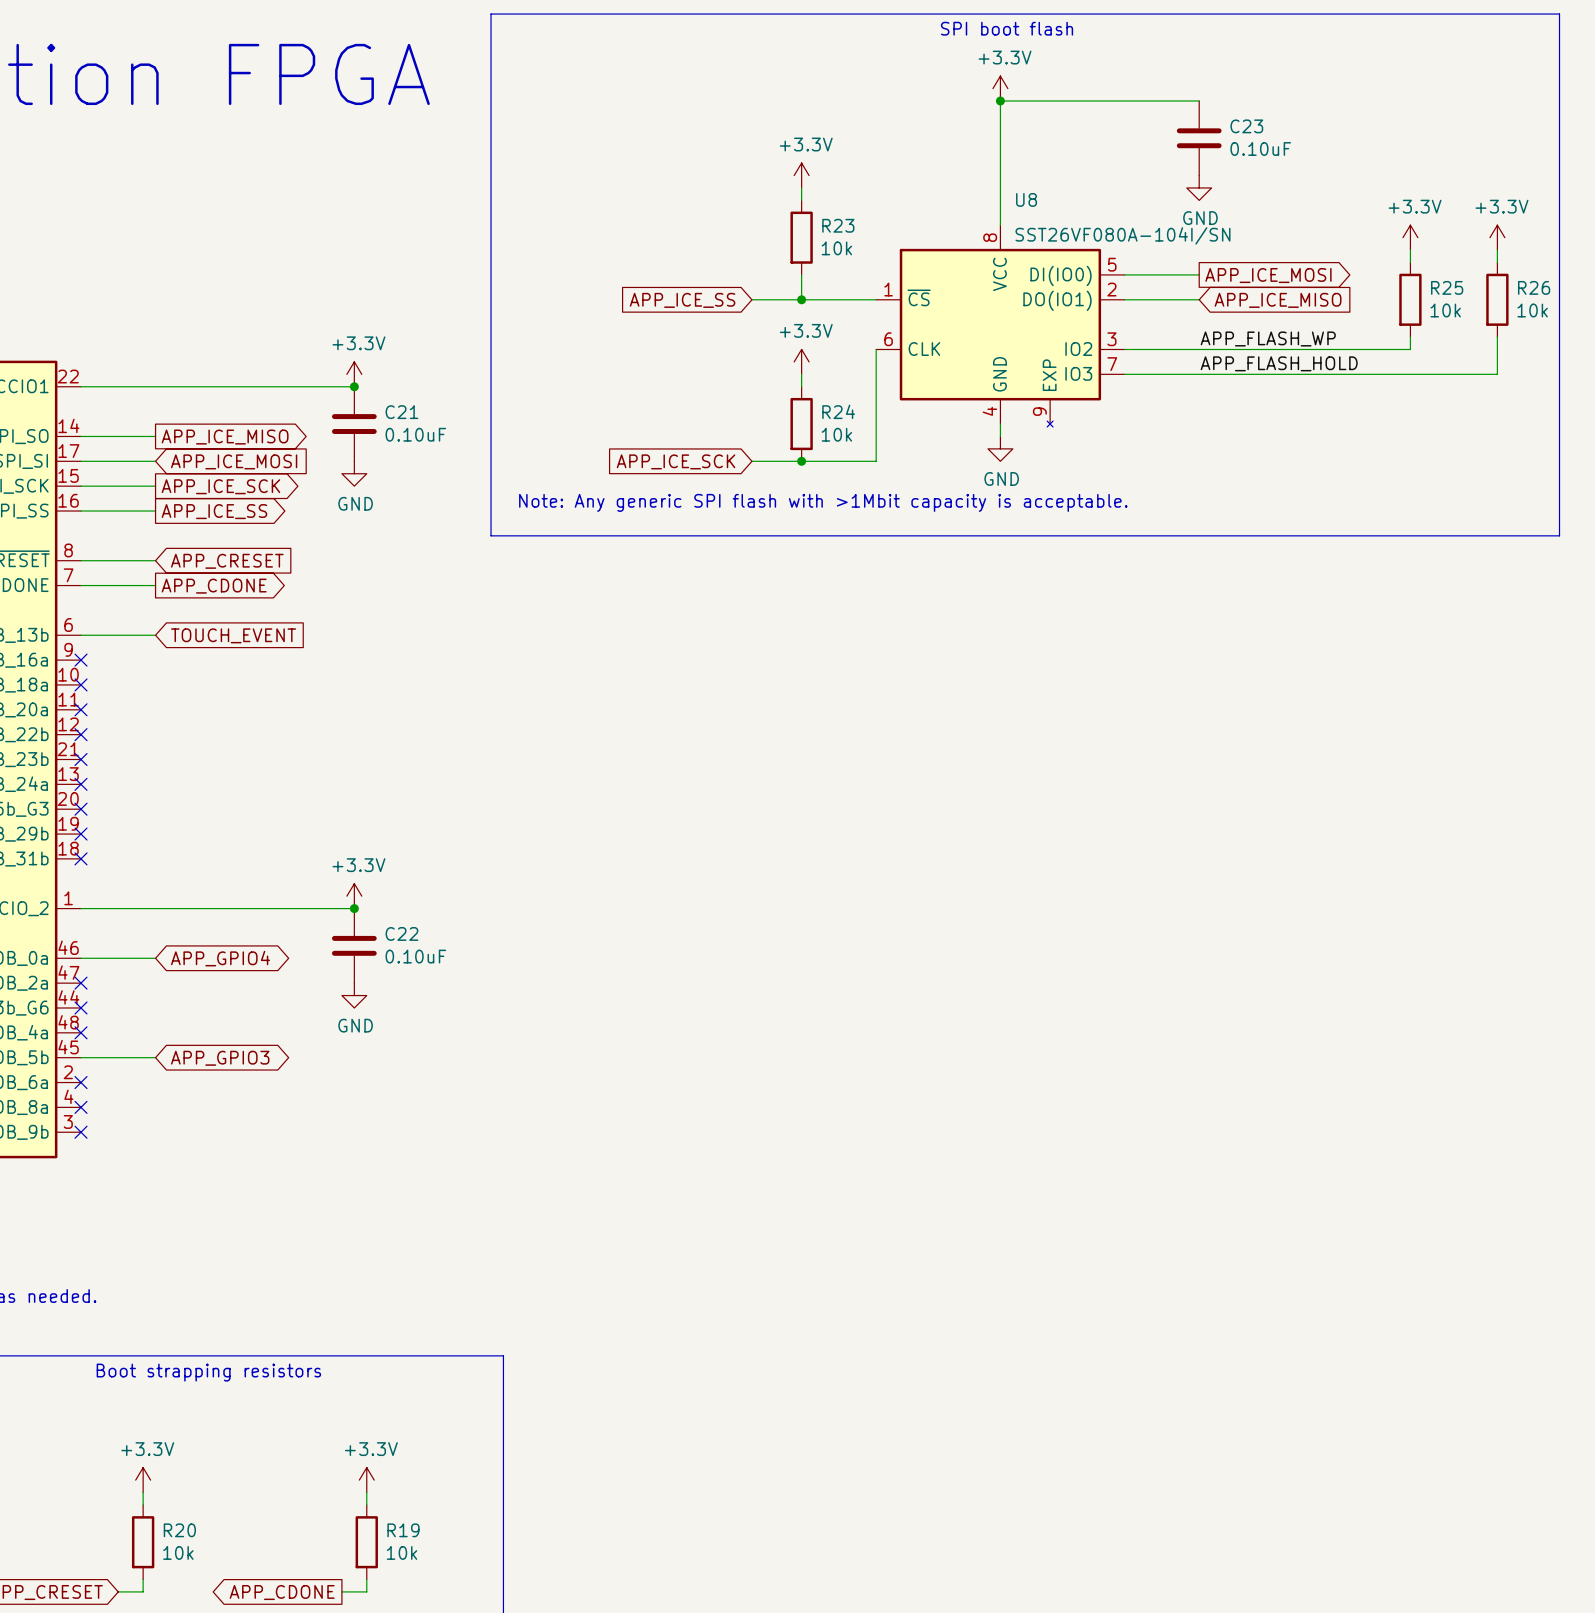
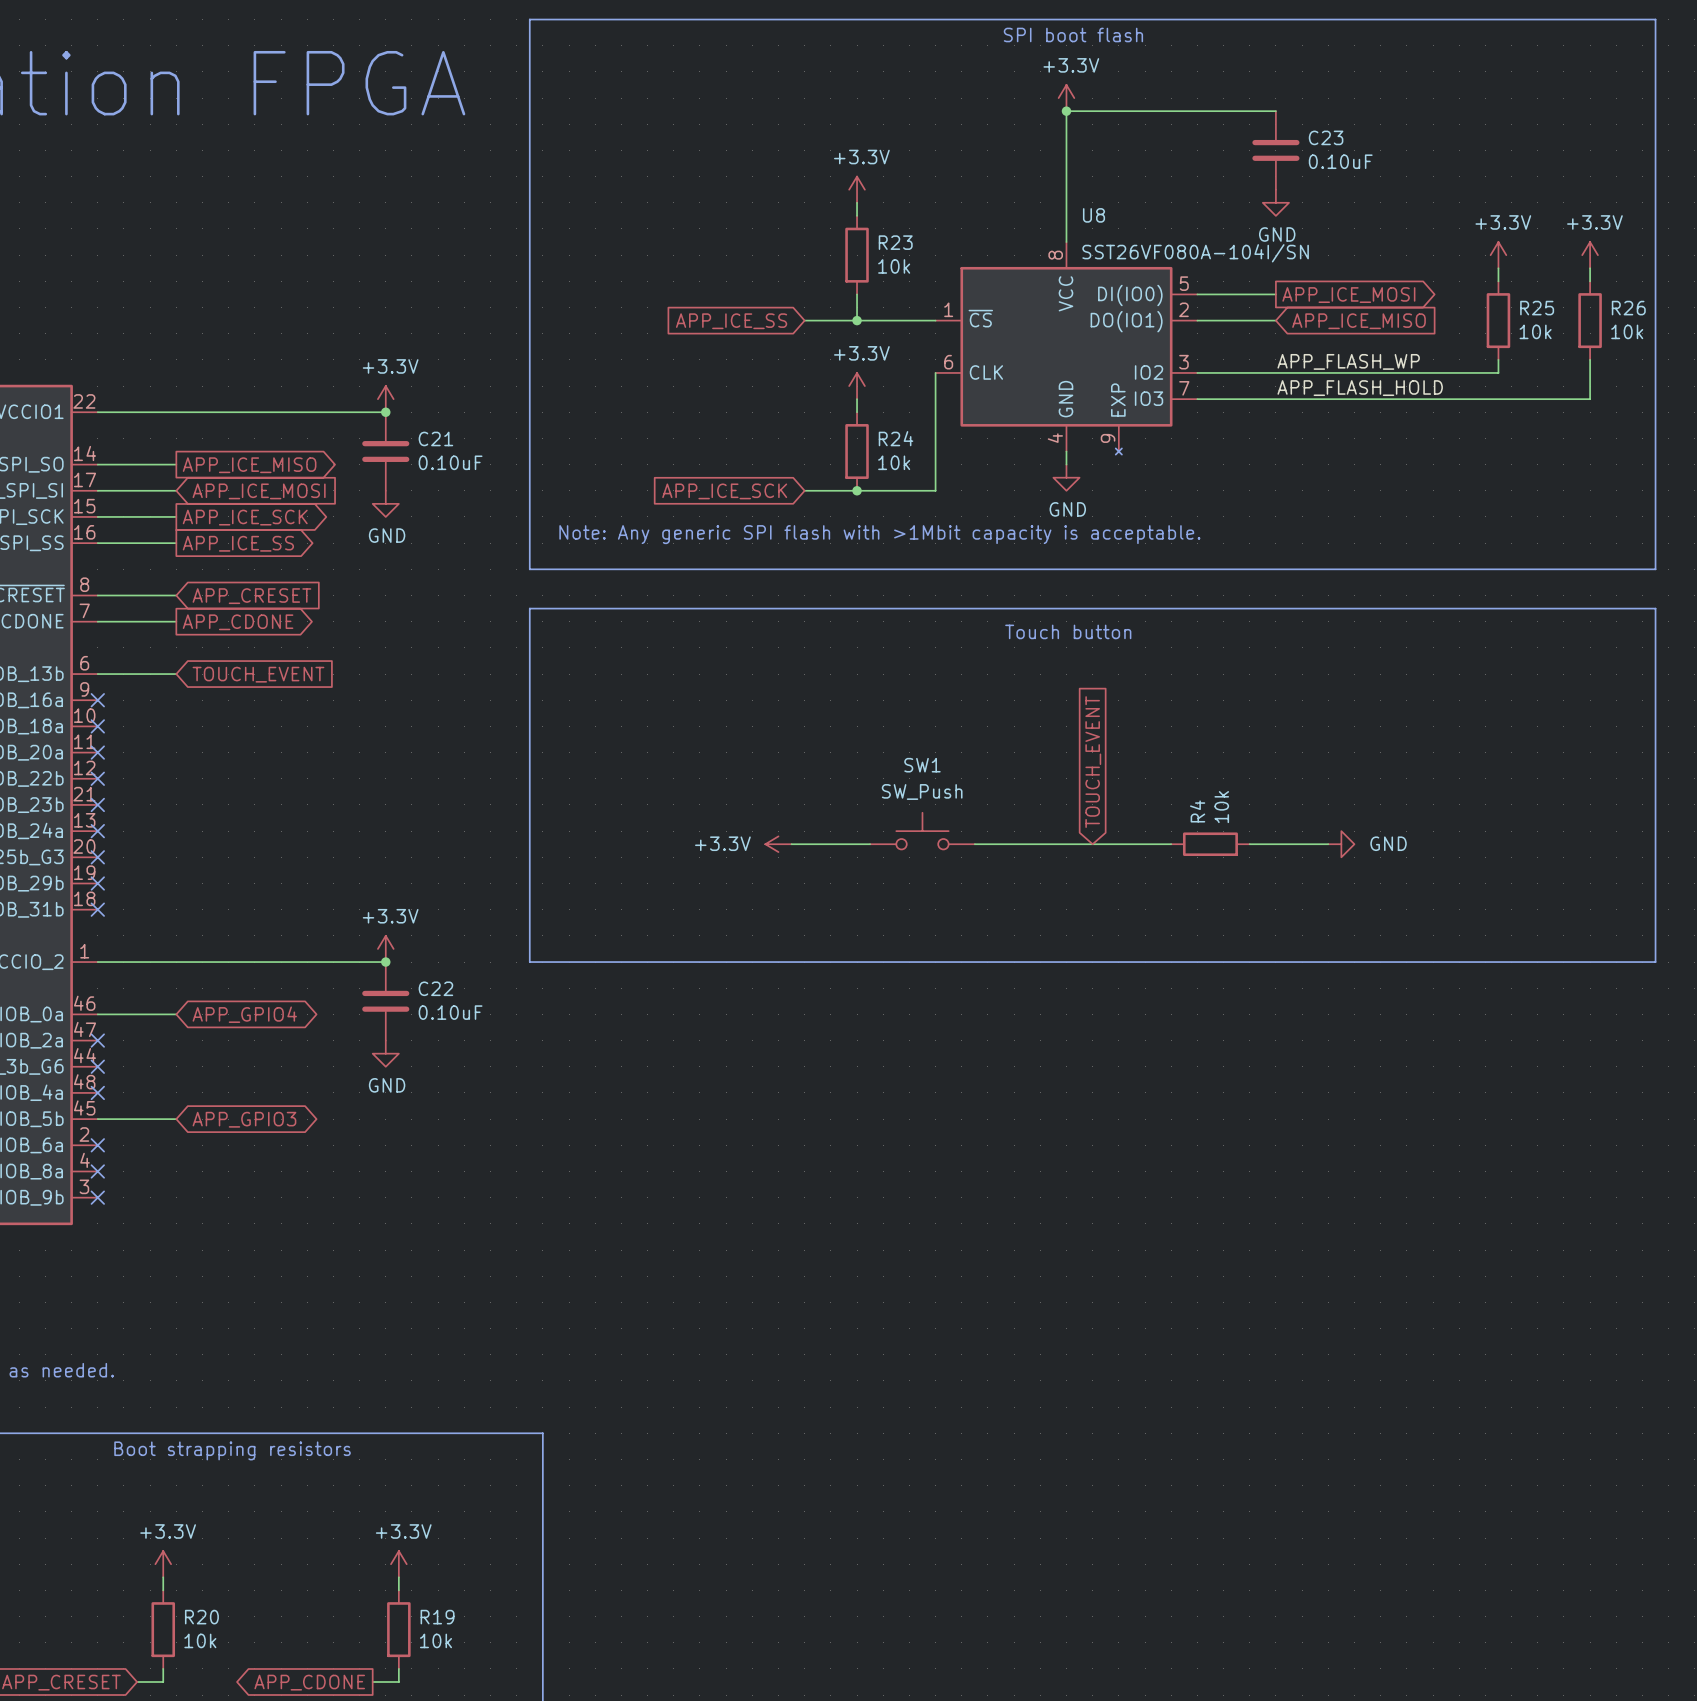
line: none -> (529, 608) (1655, 608) (1655, 962) (529, 962) (529, 608)
text: none -> Touch button (1068, 631)
global label: none -> TOUCH_EVENT (1093, 762)
SW1: none -> SW_Push (922, 831)
power symbol: none -> +3.3V (778, 844)
wire: none -> (791, 844) (870, 844)
wire: none -> (974, 844) (1171, 844)
R4: none -> 10k (1210, 844)
wire: none -> (1249, 844) (1328, 844)
power symbol: none -> GND (1341, 844)

